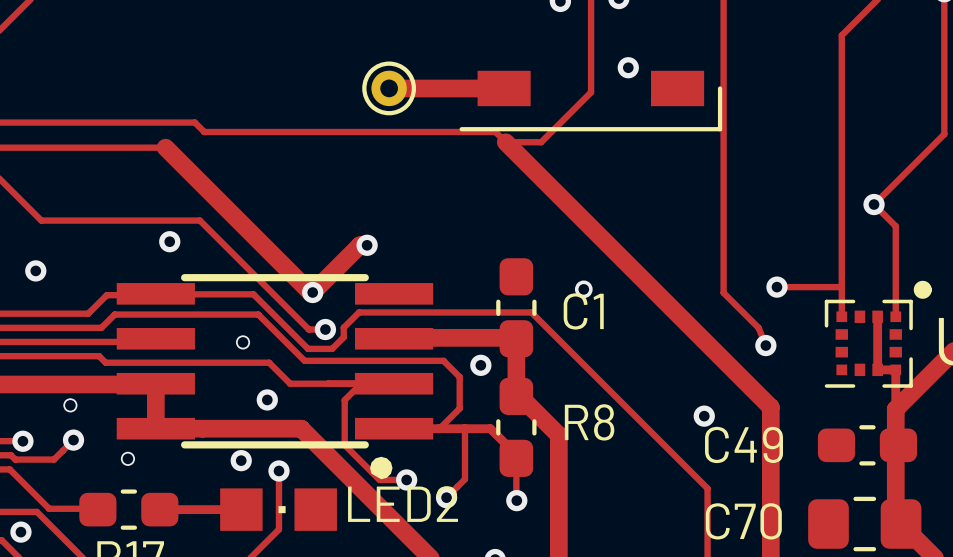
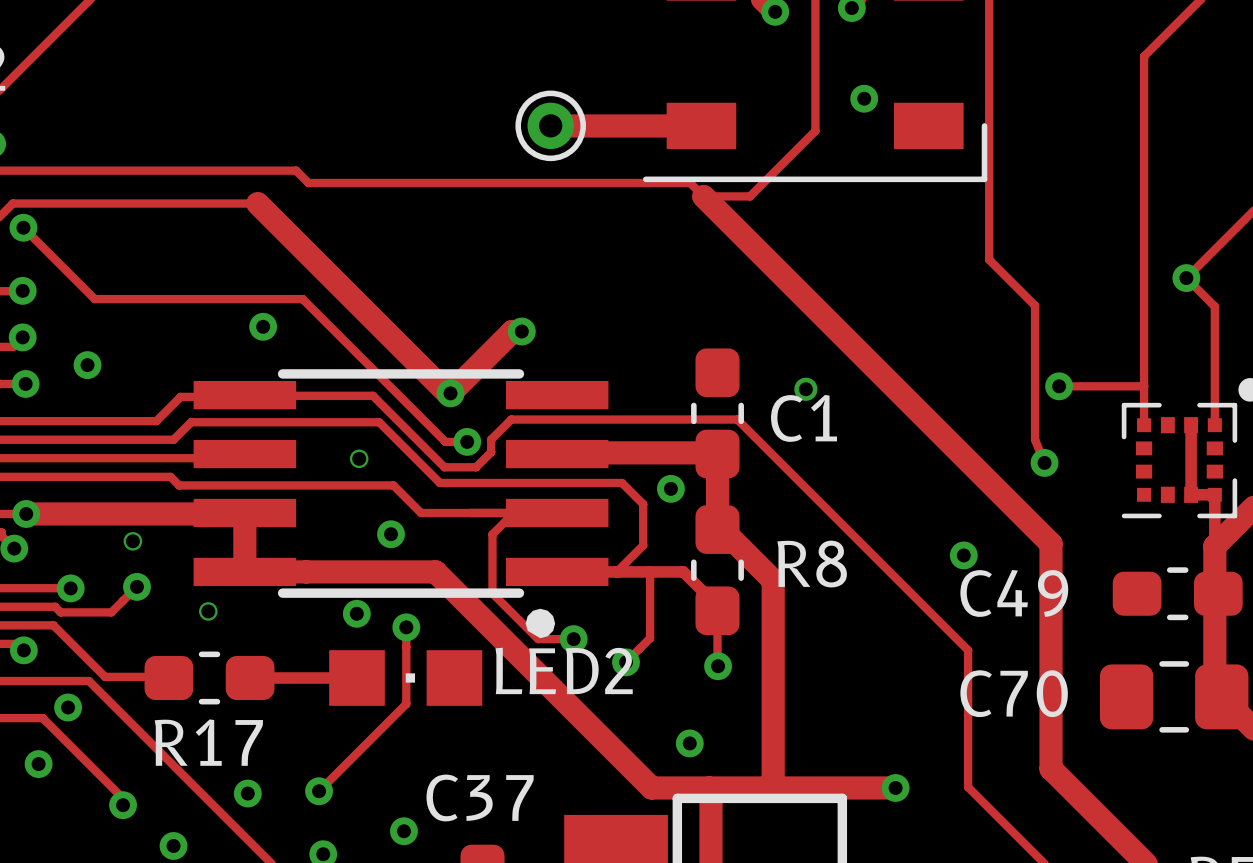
track: (723, 190) (723, 292) (758, 327) -> (989, 259) (1035, 305) (1035, 439)

